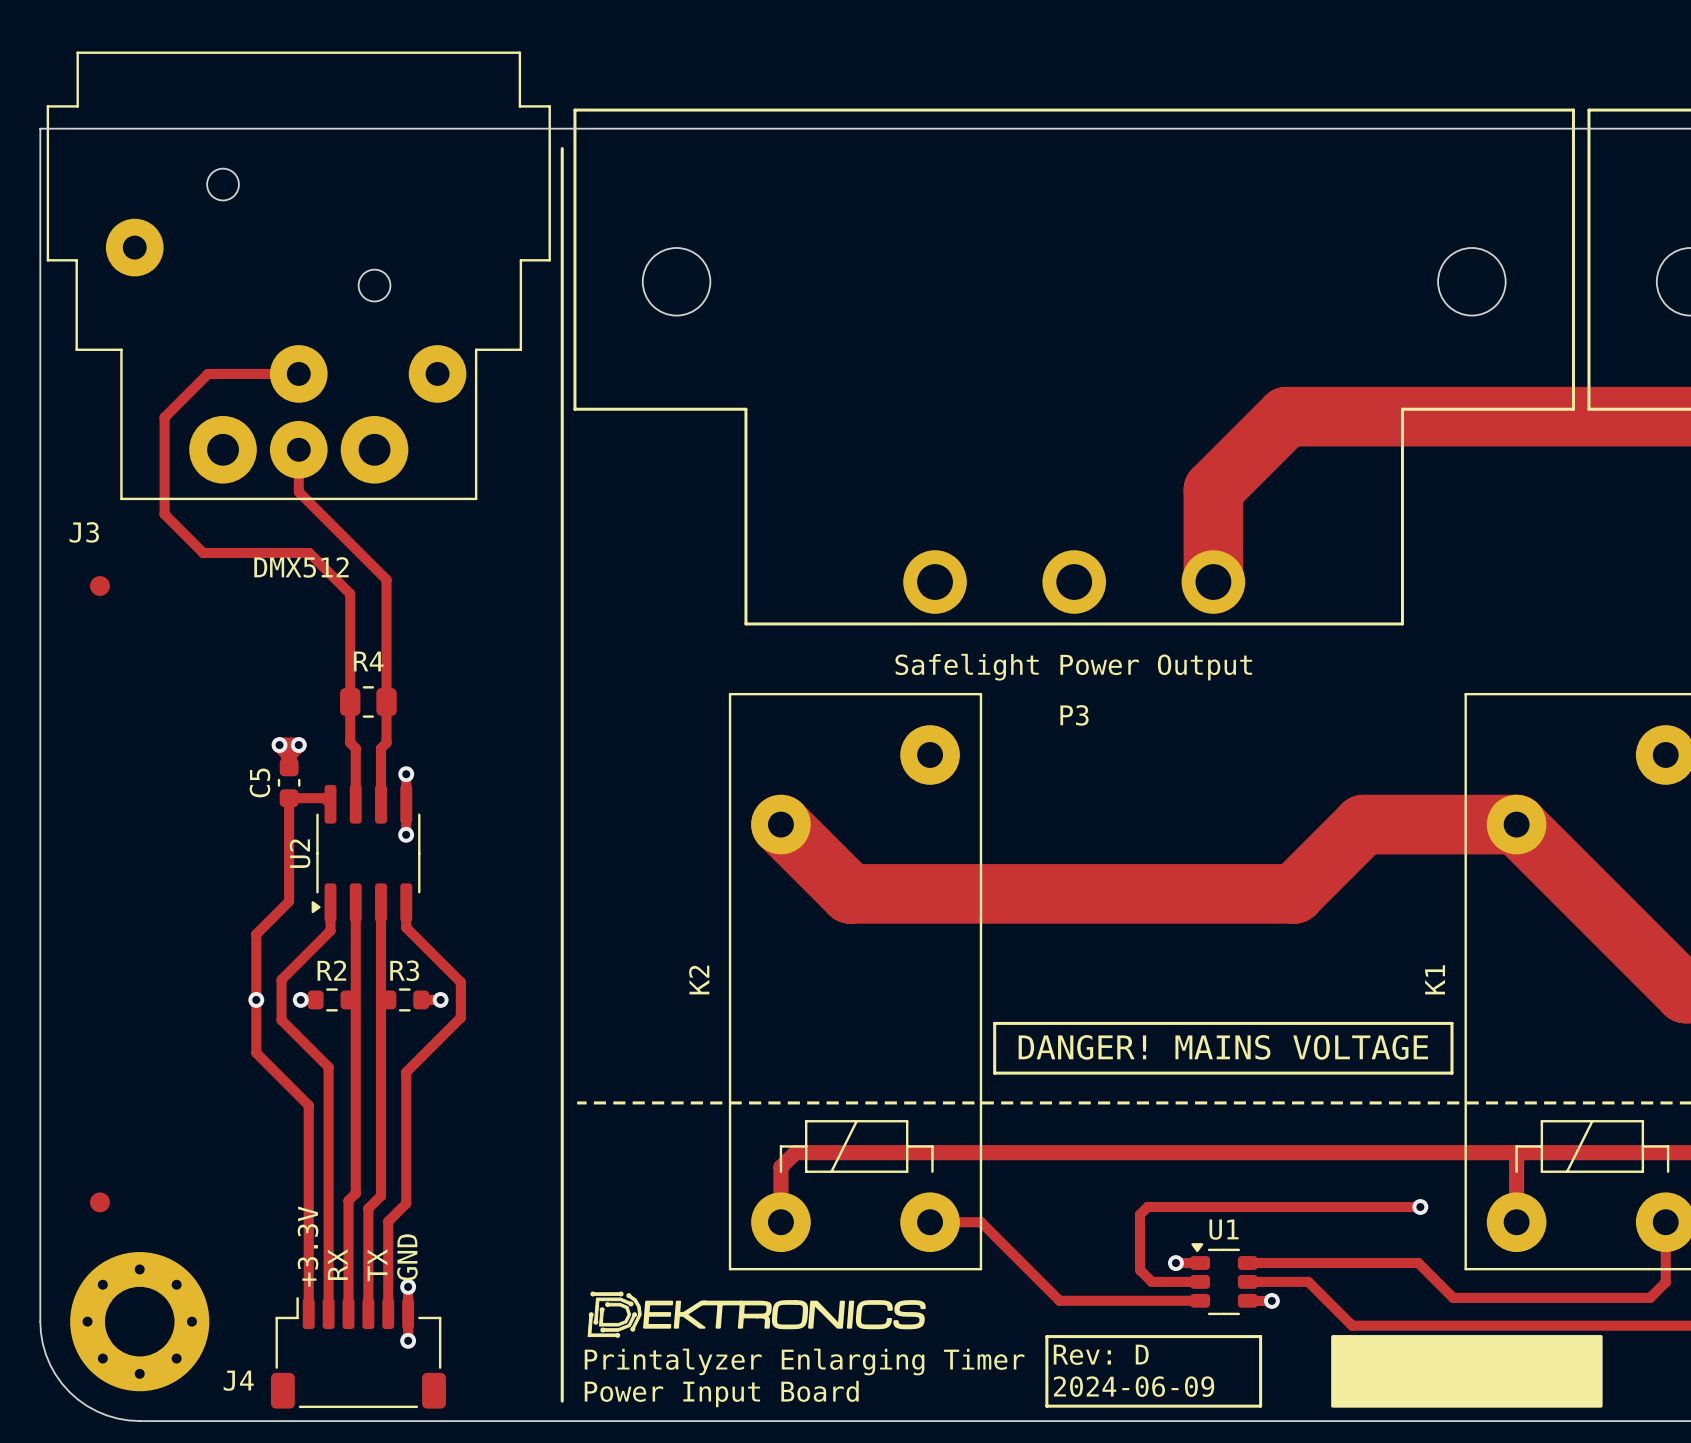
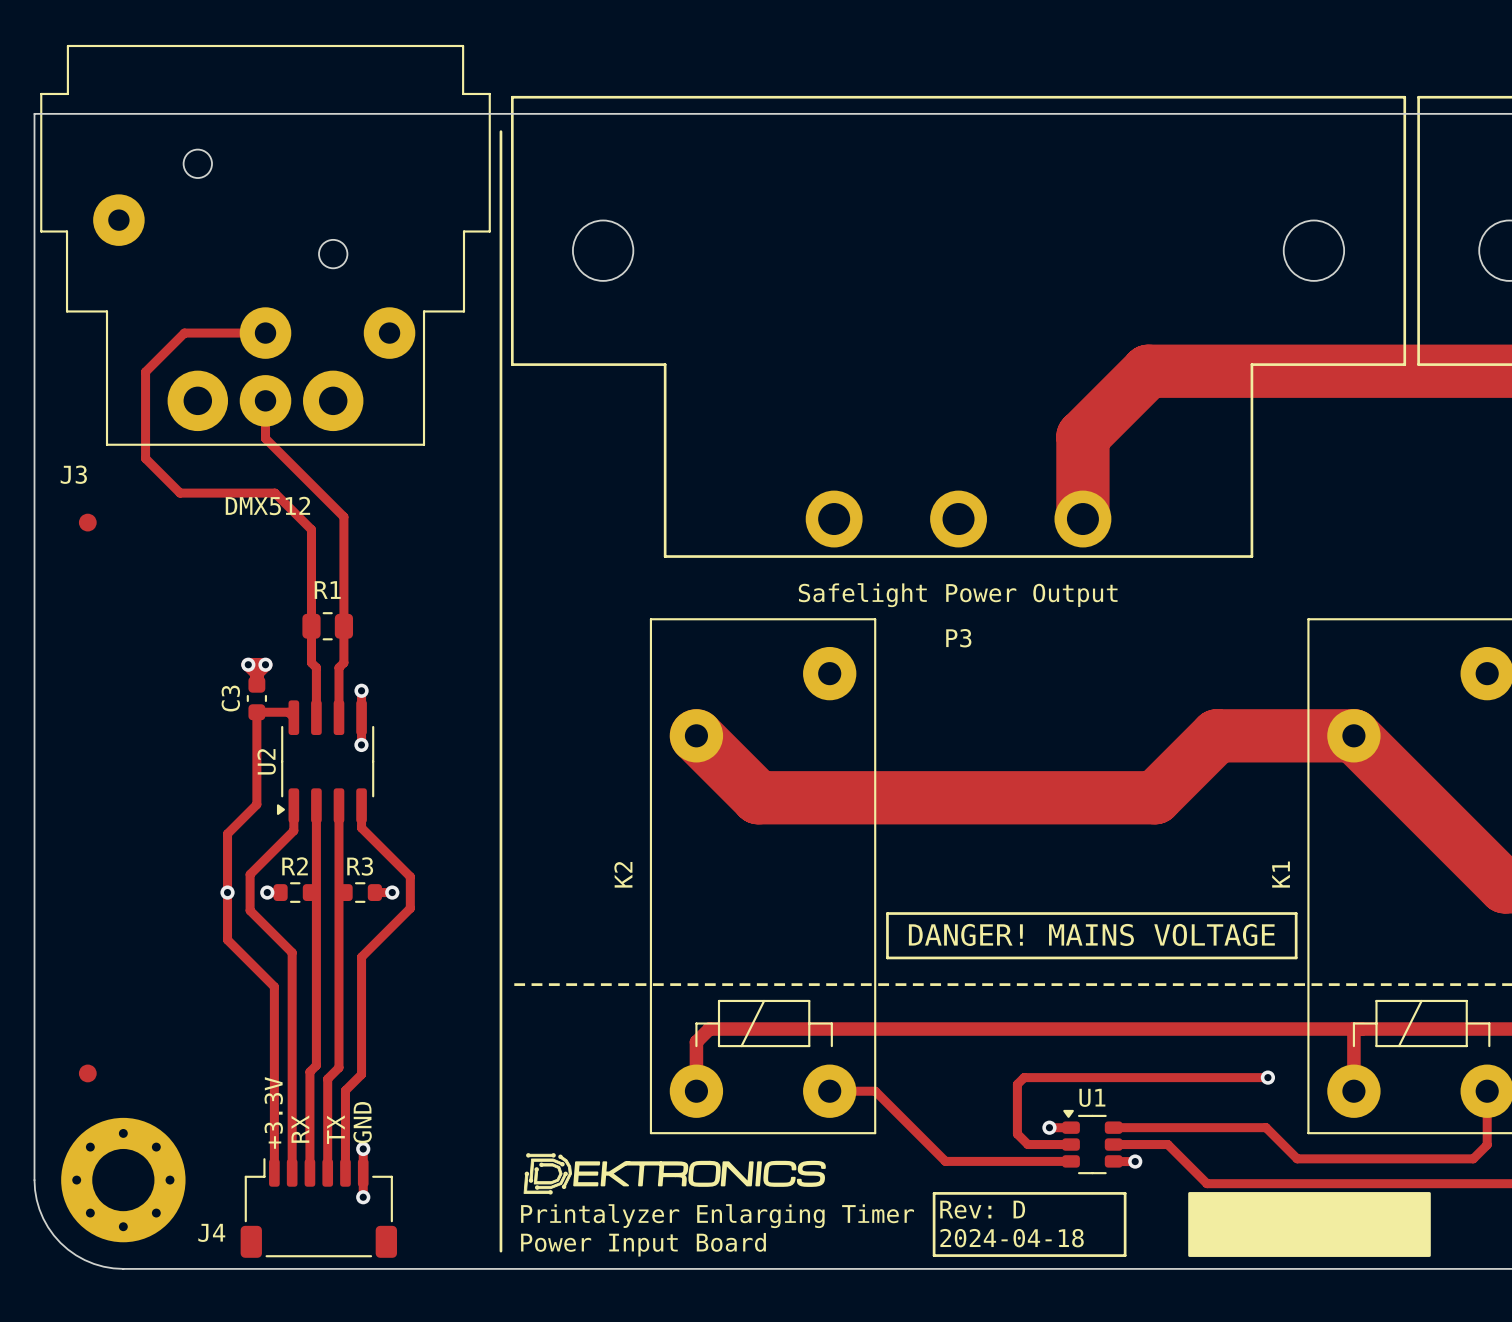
R4 name: R4 (368, 661) -> R1 (327, 590)
C5 name: C5 (259, 782) -> C3 (230, 698)
text: 2024-06-09 (1134, 1386) -> 2024-04-18 (1012, 1238)

